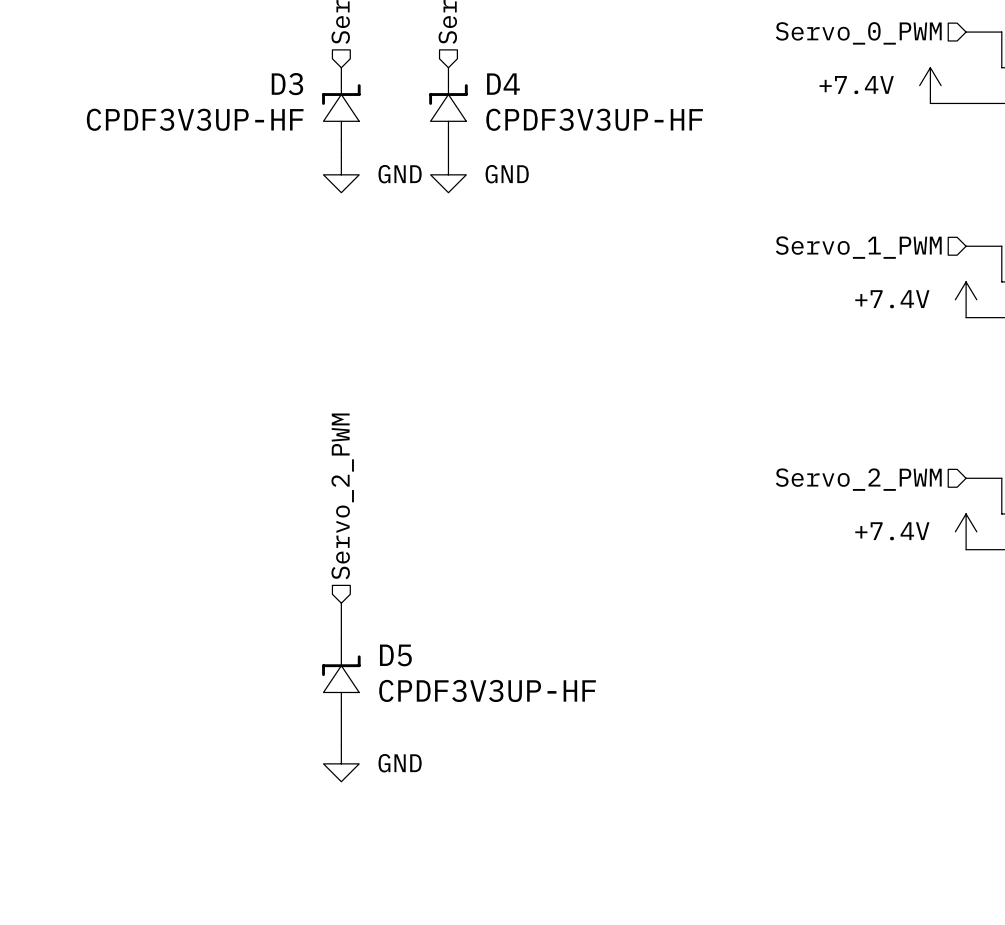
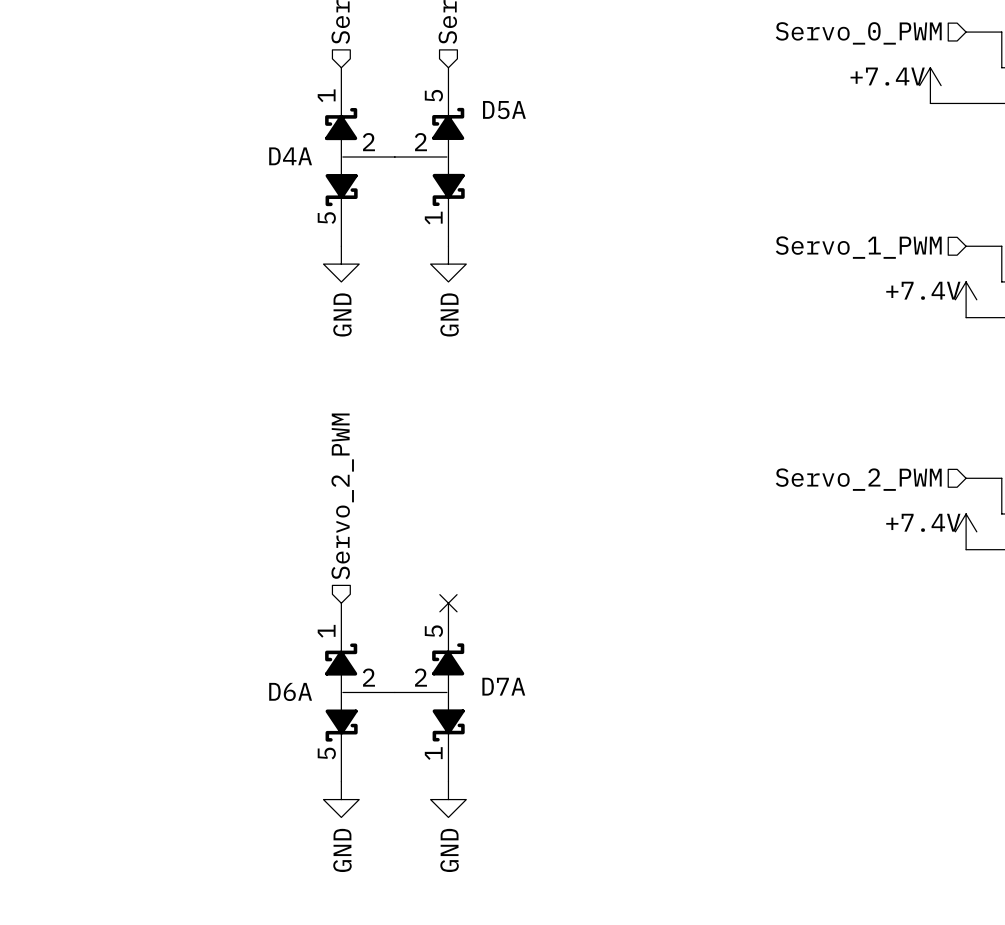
power symbol text position: +7.4V (856, 85) -> +7.4V (887, 76)
D3: CPDF3V3UP-HF (341, 103) -> none
D4: CPDF3V3UP-HF (448, 103) -> none
D4A: none -> (360, 157)
D5A: none -> (429, 157)
power symbol: GND (341, 174) -> none
power symbol: GND (448, 174) -> none
power symbol: none -> GND (341, 264)
power symbol: none -> GND (448, 264)
power symbol text position: +7.4V (892, 299) -> +7.4V (923, 290)
power symbol text position: +7.4V (892, 531) -> +7.4V (923, 522)
no-connect mark: none -> (448, 603)
D5: CPDF3V3UP-HF (341, 674) -> none
D6A: none -> (360, 692)
D7A: none -> (429, 692)
power symbol position: GND (341, 763) -> GND (341, 799)
power symbol text rotation: 0° (400, 763) -> 90° counterclockwise (342, 850)
power symbol text position: GND (400, 763) -> GND (342, 850)
power symbol: none -> GND (448, 799)

